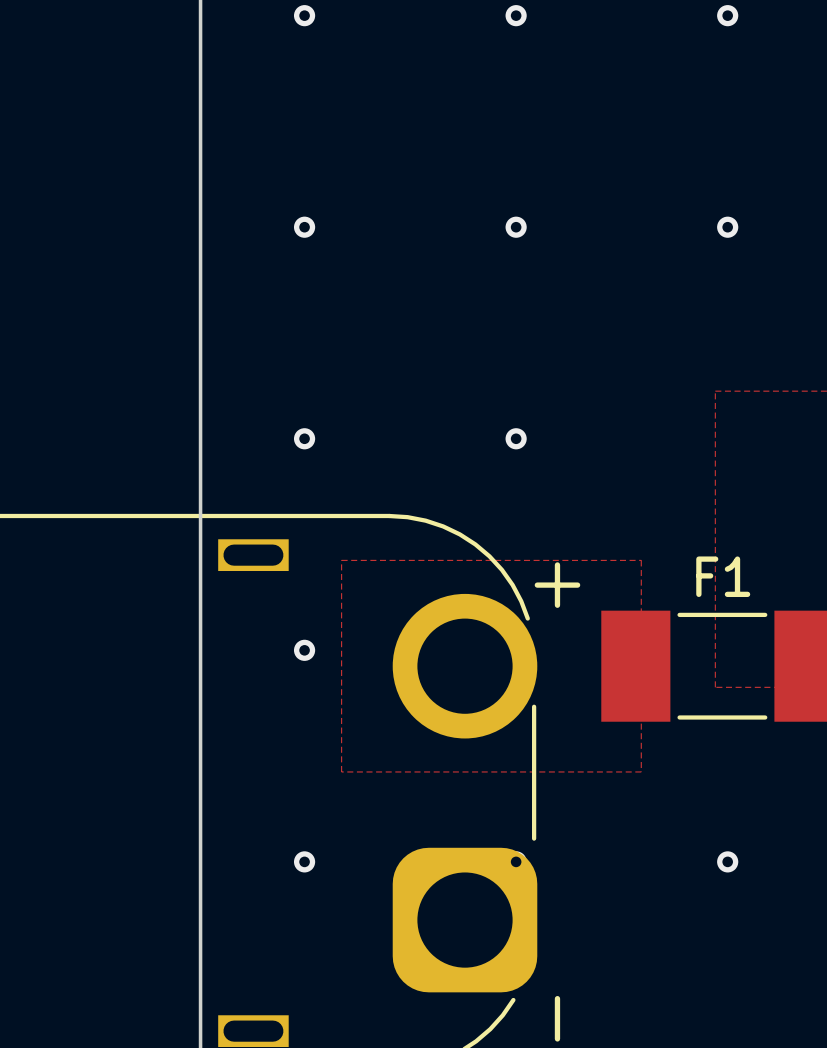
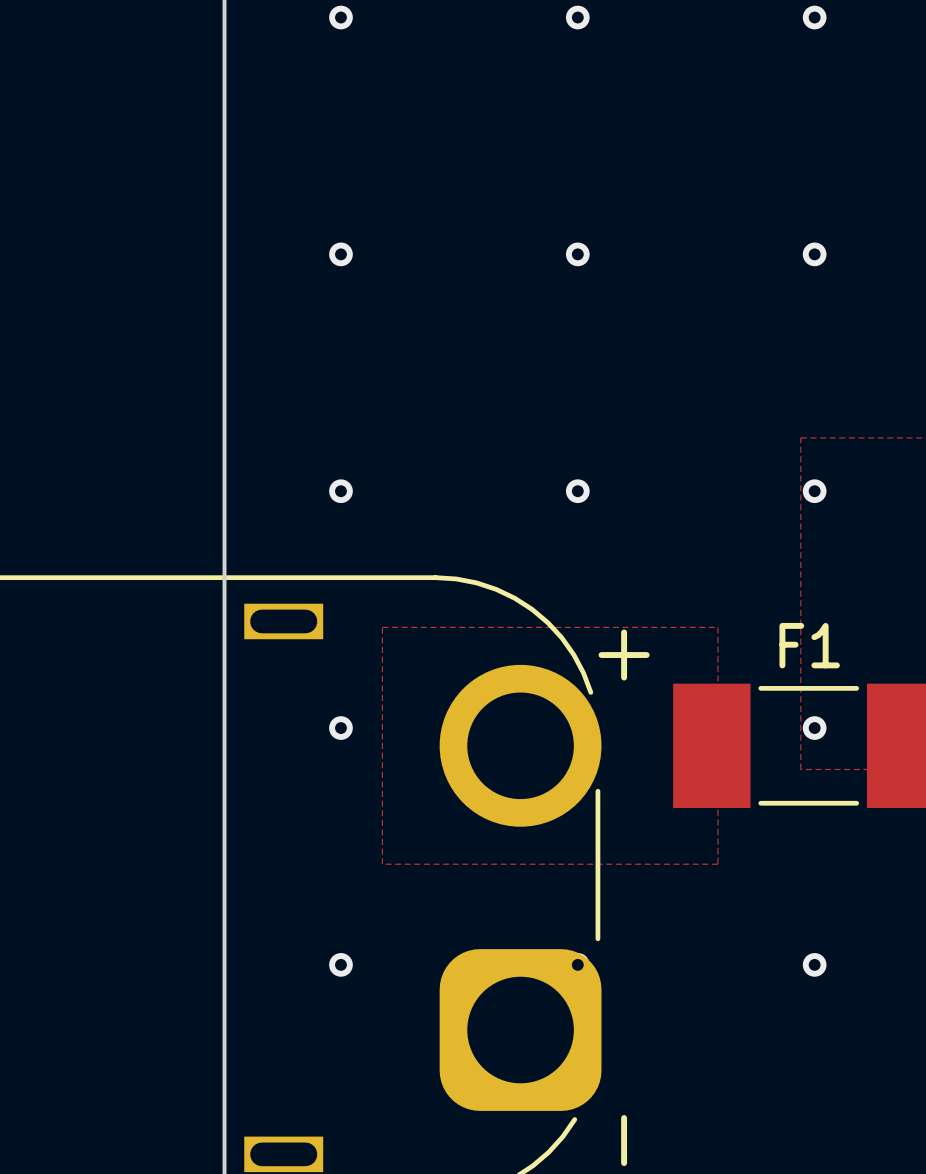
via: none -> (814, 491)
via: none -> (814, 728)

